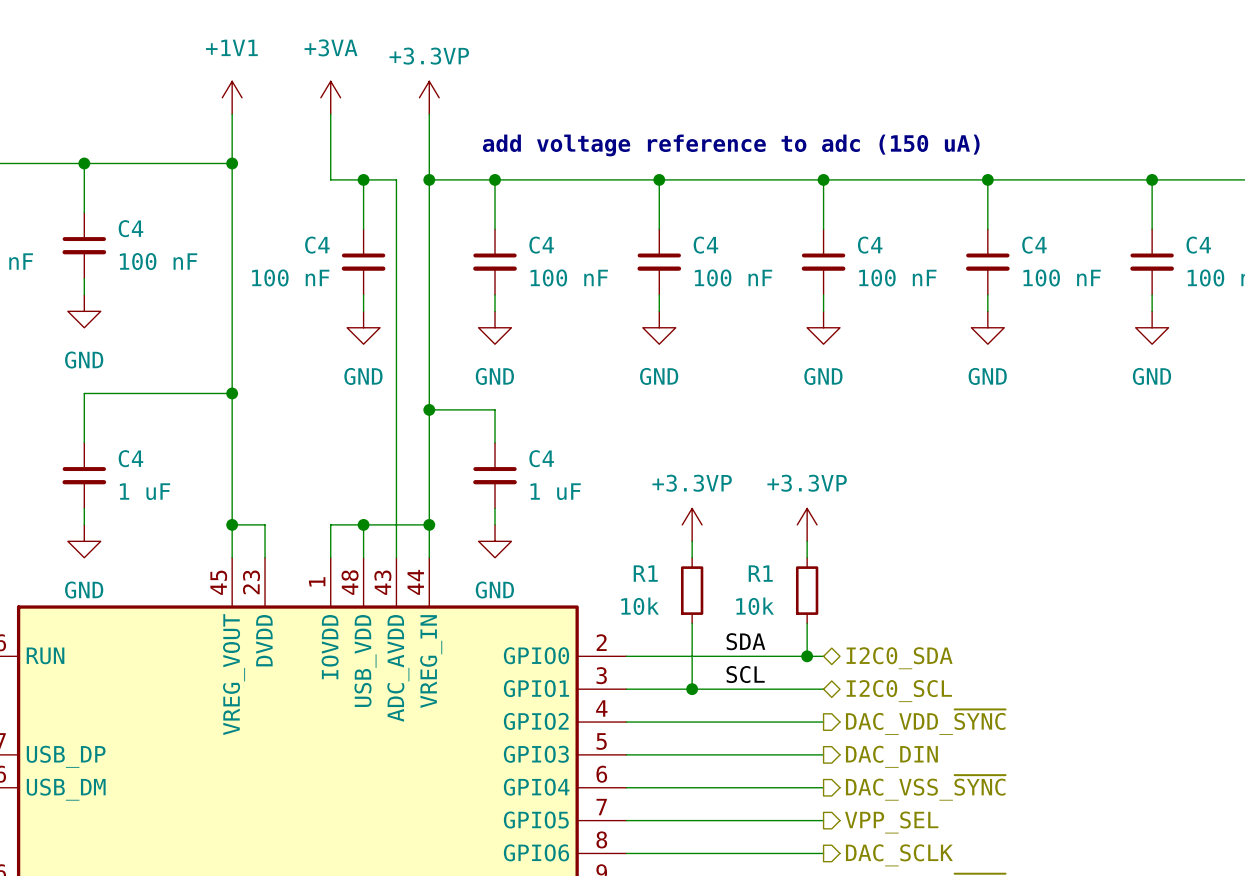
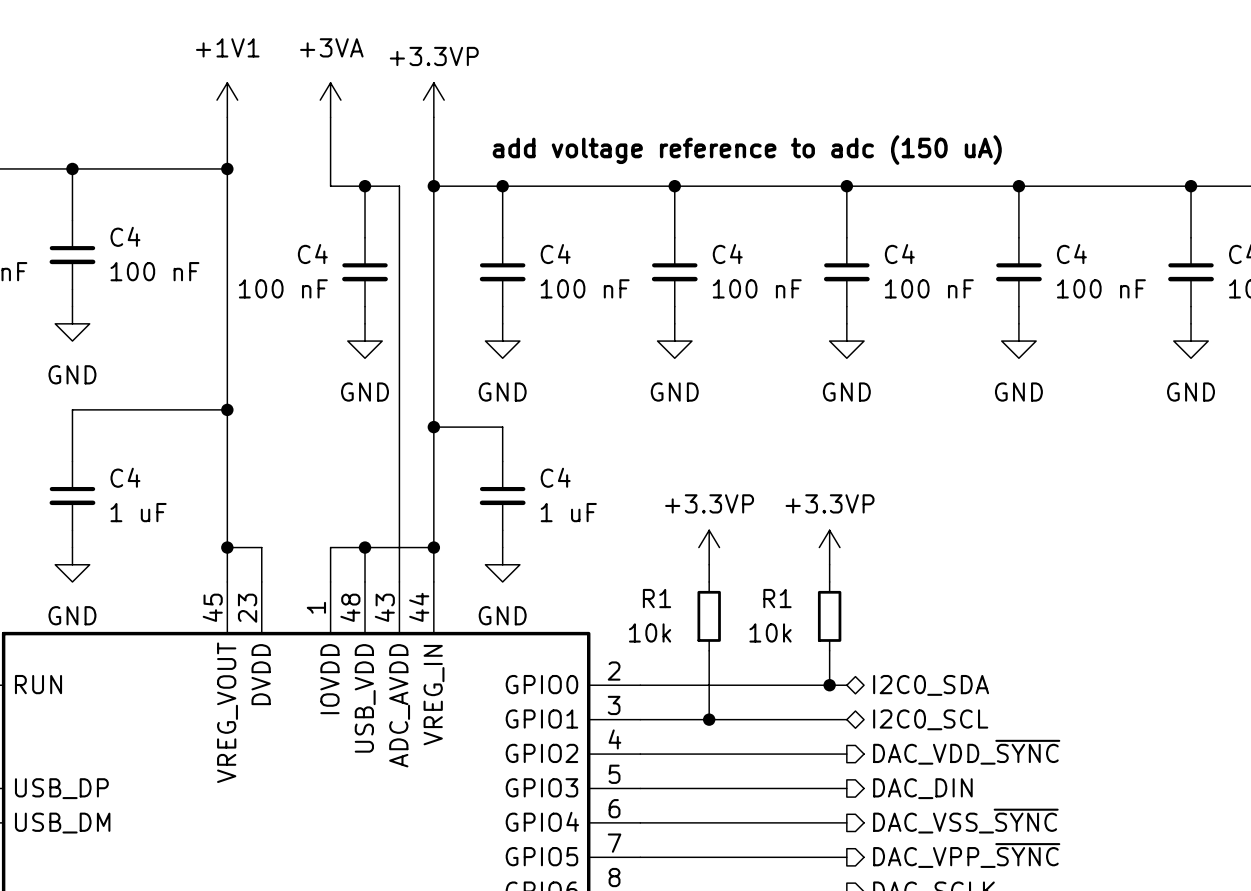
label: SDA (745, 641) -> none
label: SCL (745, 674) -> none
hierarchical label: VPP_SEL (891, 822) -> DAC_VPP_~{SYNC} (966, 855)

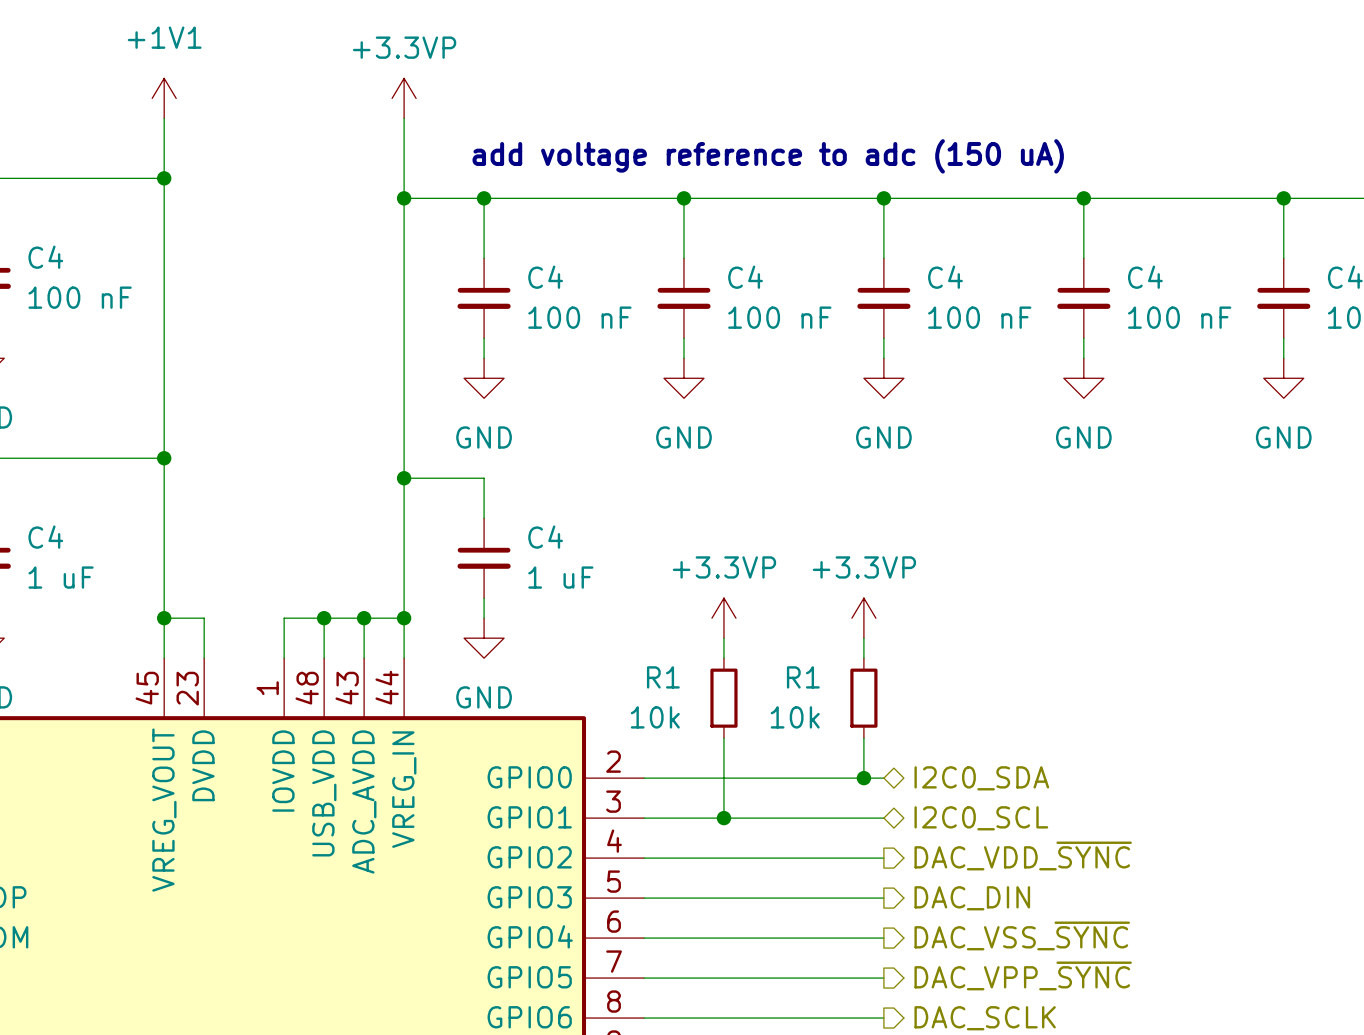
power symbol: +3VA (330, 100) -> none
wire: (330, 117) (330, 186) (399, 186) (399, 547) -> none
wire: (365, 186) (365, 237) -> none
junction: (365, 186) -> none
C4: 100 nF (365, 272) -> none
wire: (365, 306) (365, 323) -> none
power symbol: GND (365, 341) -> none
junction: none -> (364, 618)

